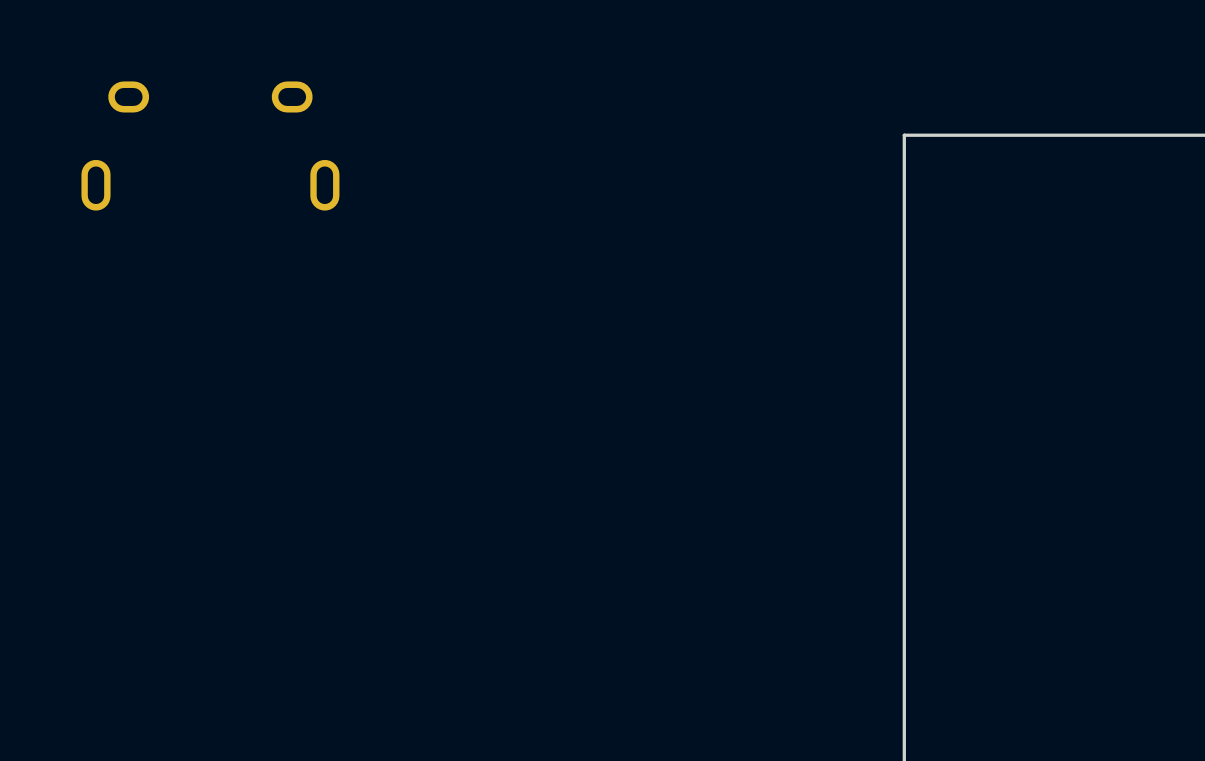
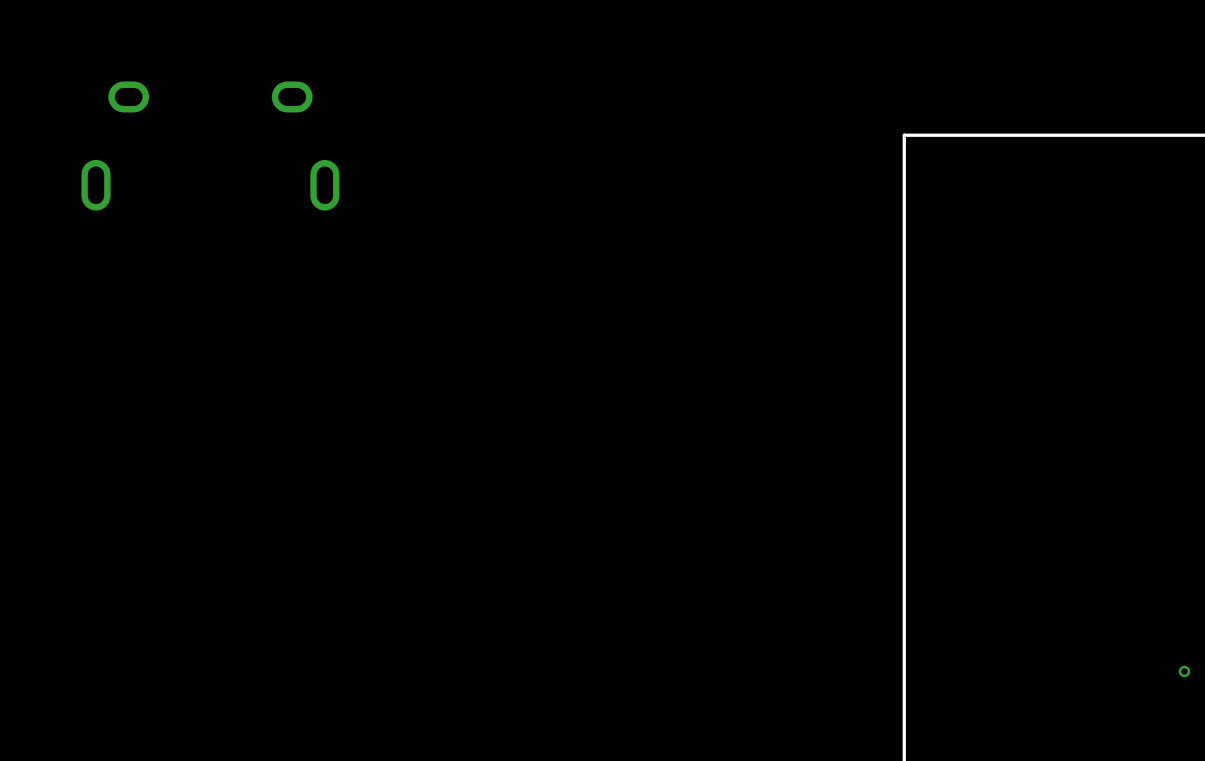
via: none -> (1184, 671)

